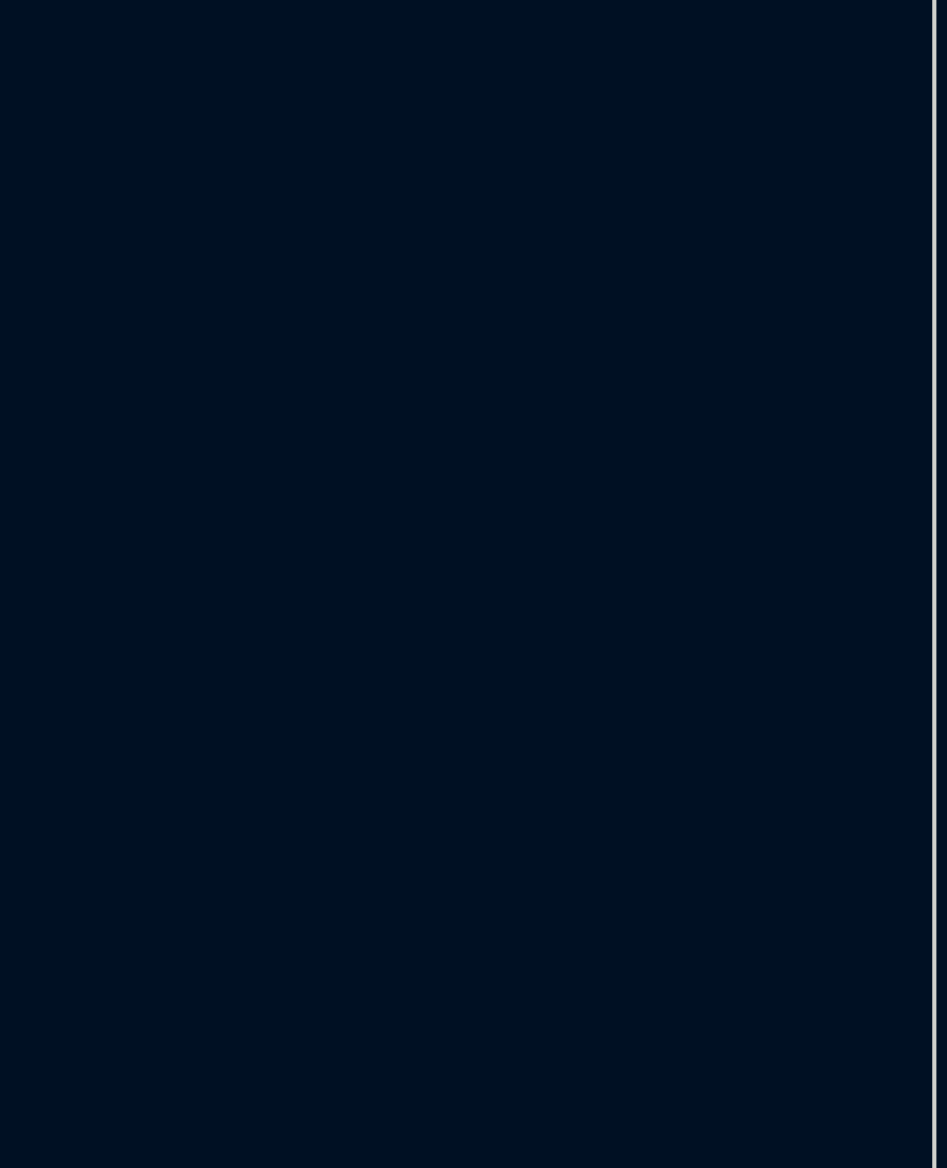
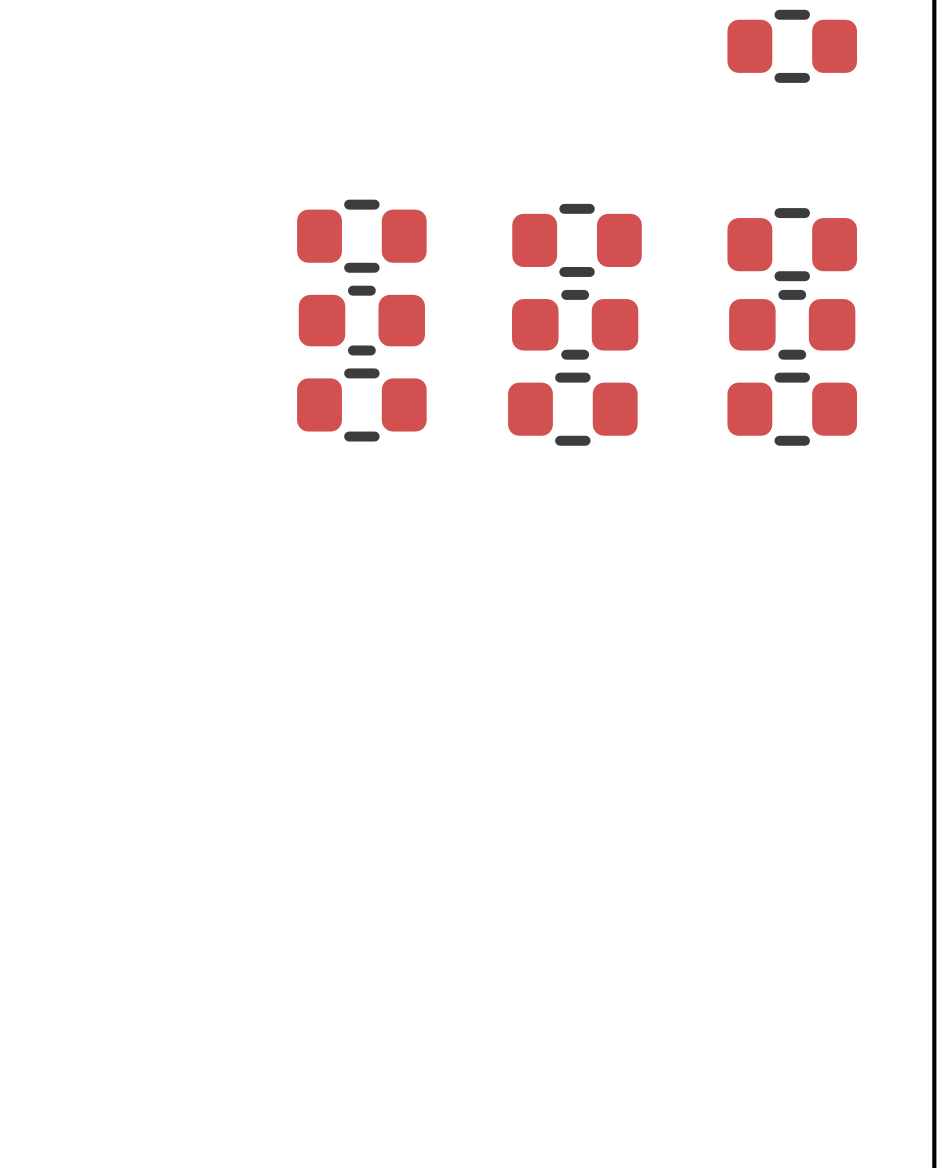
part: none -> (792, 46)
part: none -> (361, 236)
part: none -> (577, 240)
part: none -> (792, 244)
part: none -> (361, 320)
part: none -> (575, 324)
part: none -> (792, 324)
part: none -> (361, 404)
part: none -> (572, 409)
part: none -> (792, 409)

